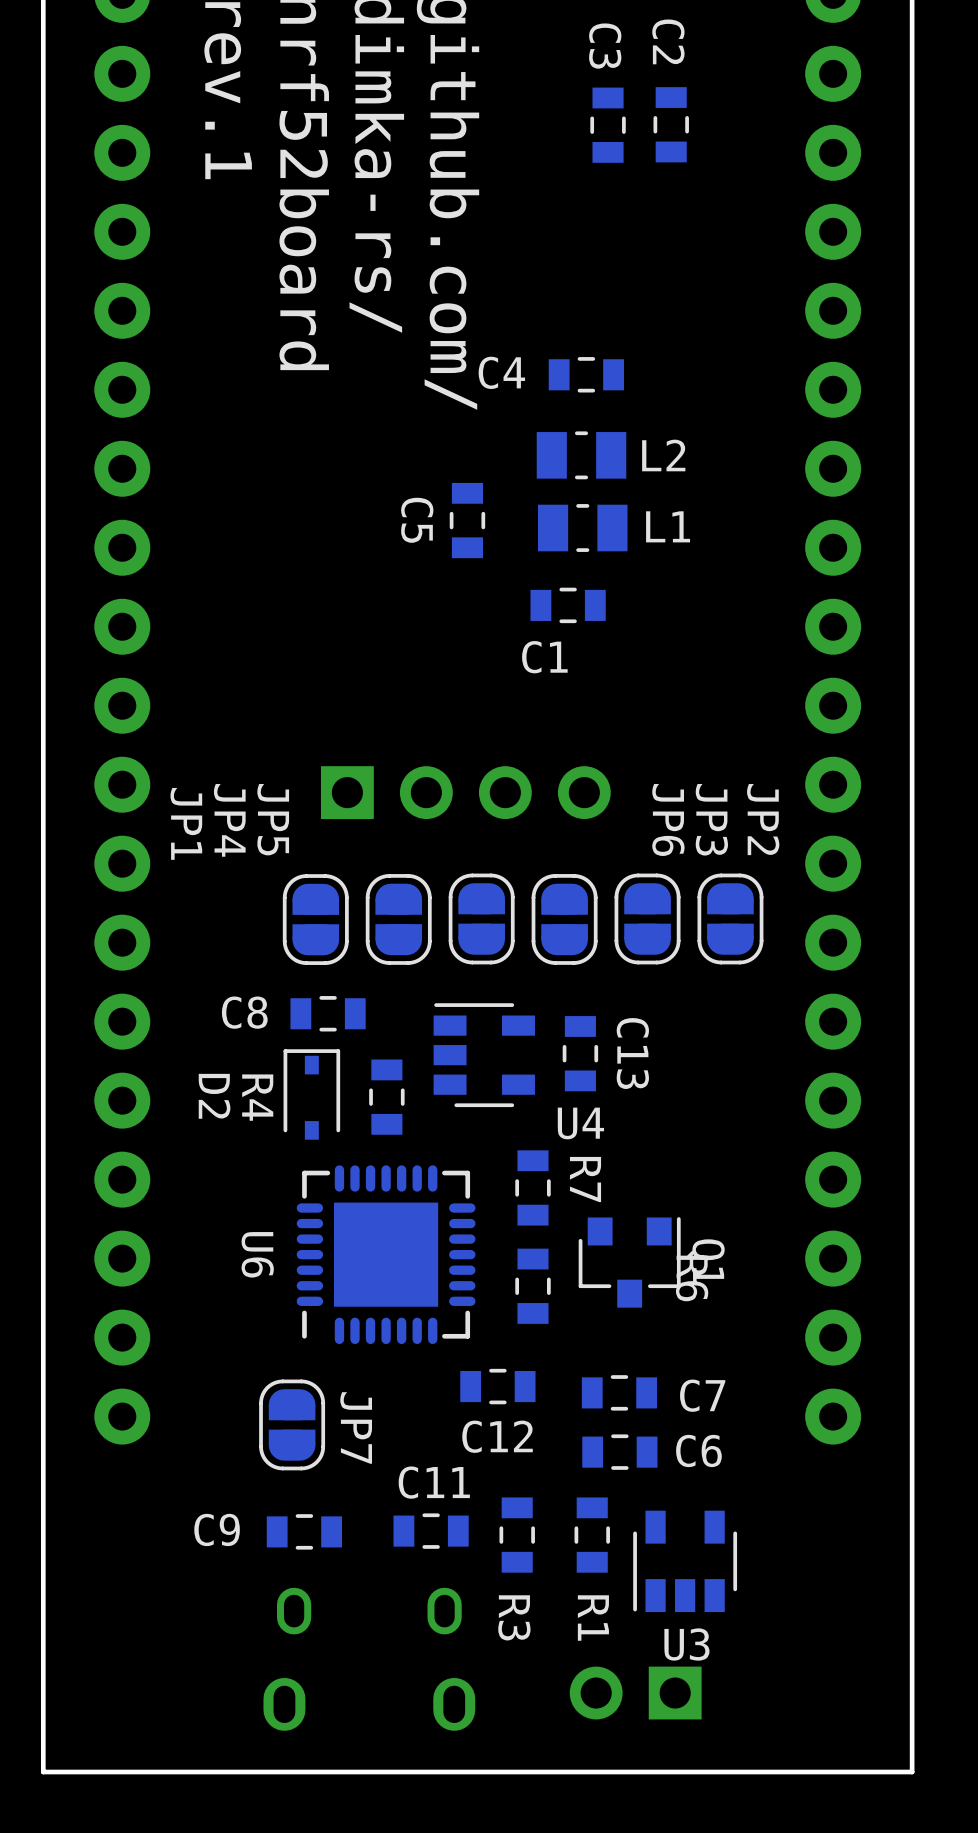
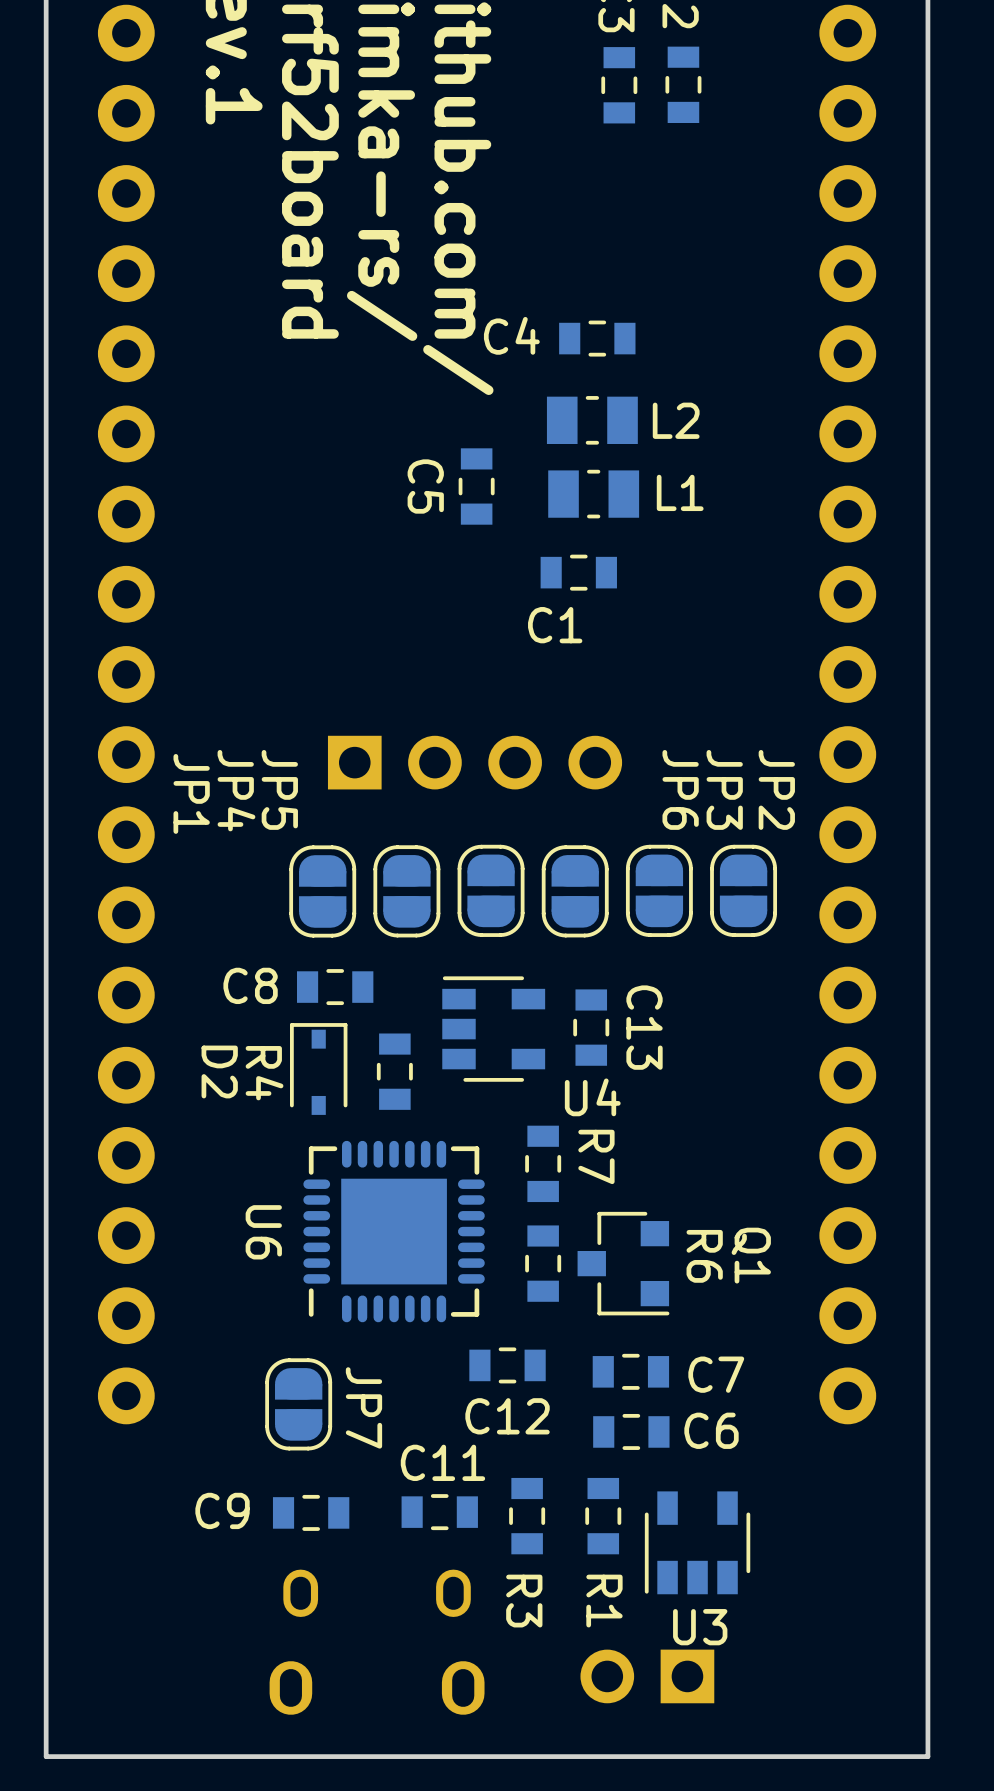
Q1 rotation: 0° (629, 1262) -> 90° clockwise (623, 1263)

